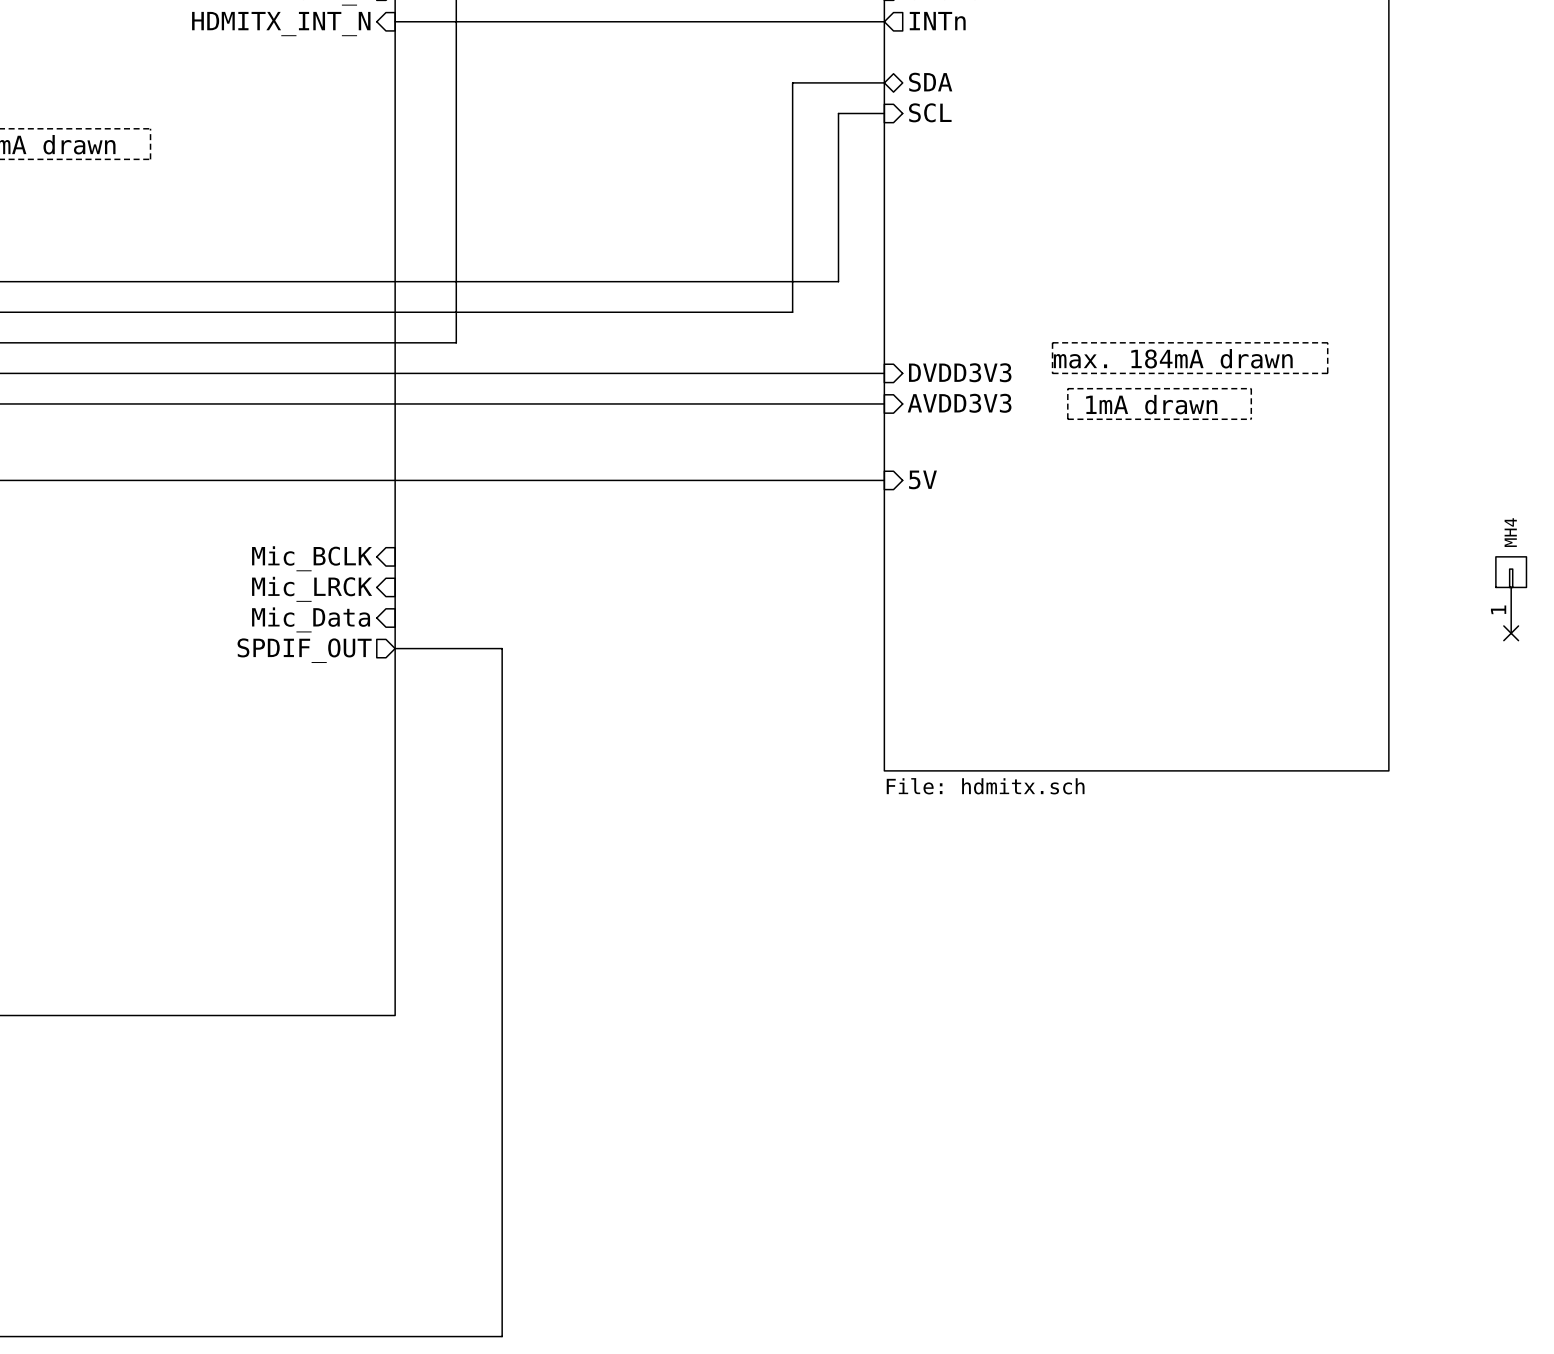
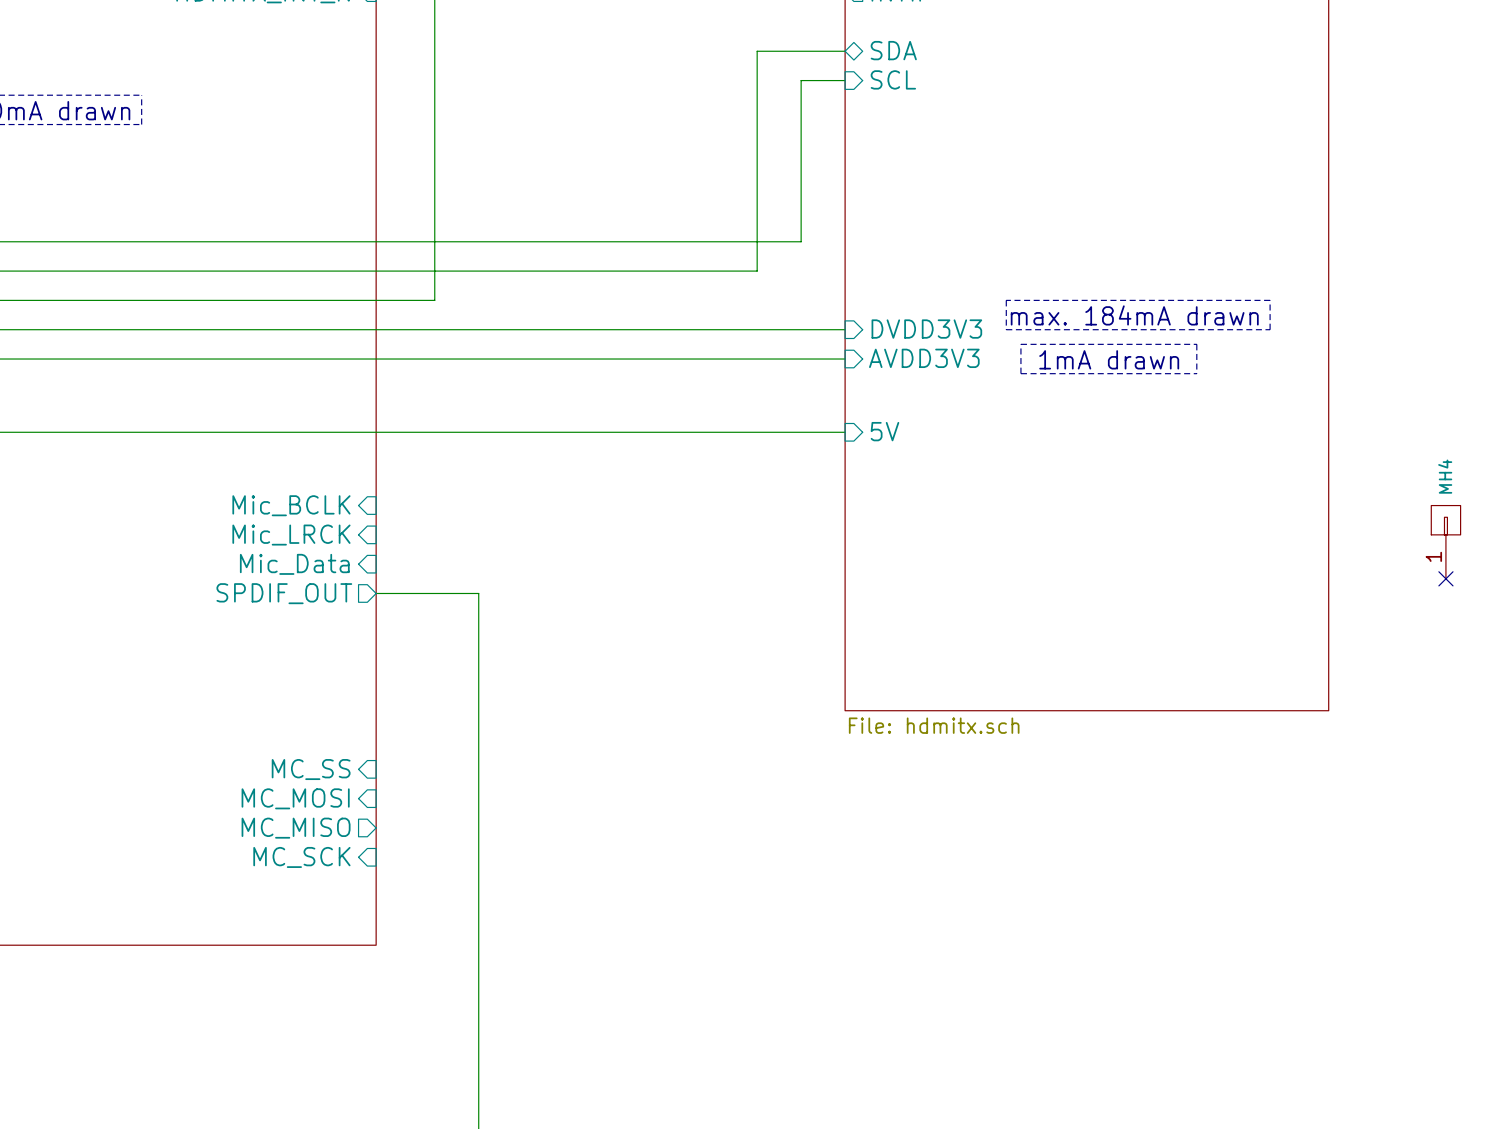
sheet pin: none -> MC_SS (311, 769)
sheet pin: none -> MC_MOSI (295, 798)
sheet pin: none -> MC_MISO (296, 828)
sheet pin: none -> MC_SCK (301, 857)

